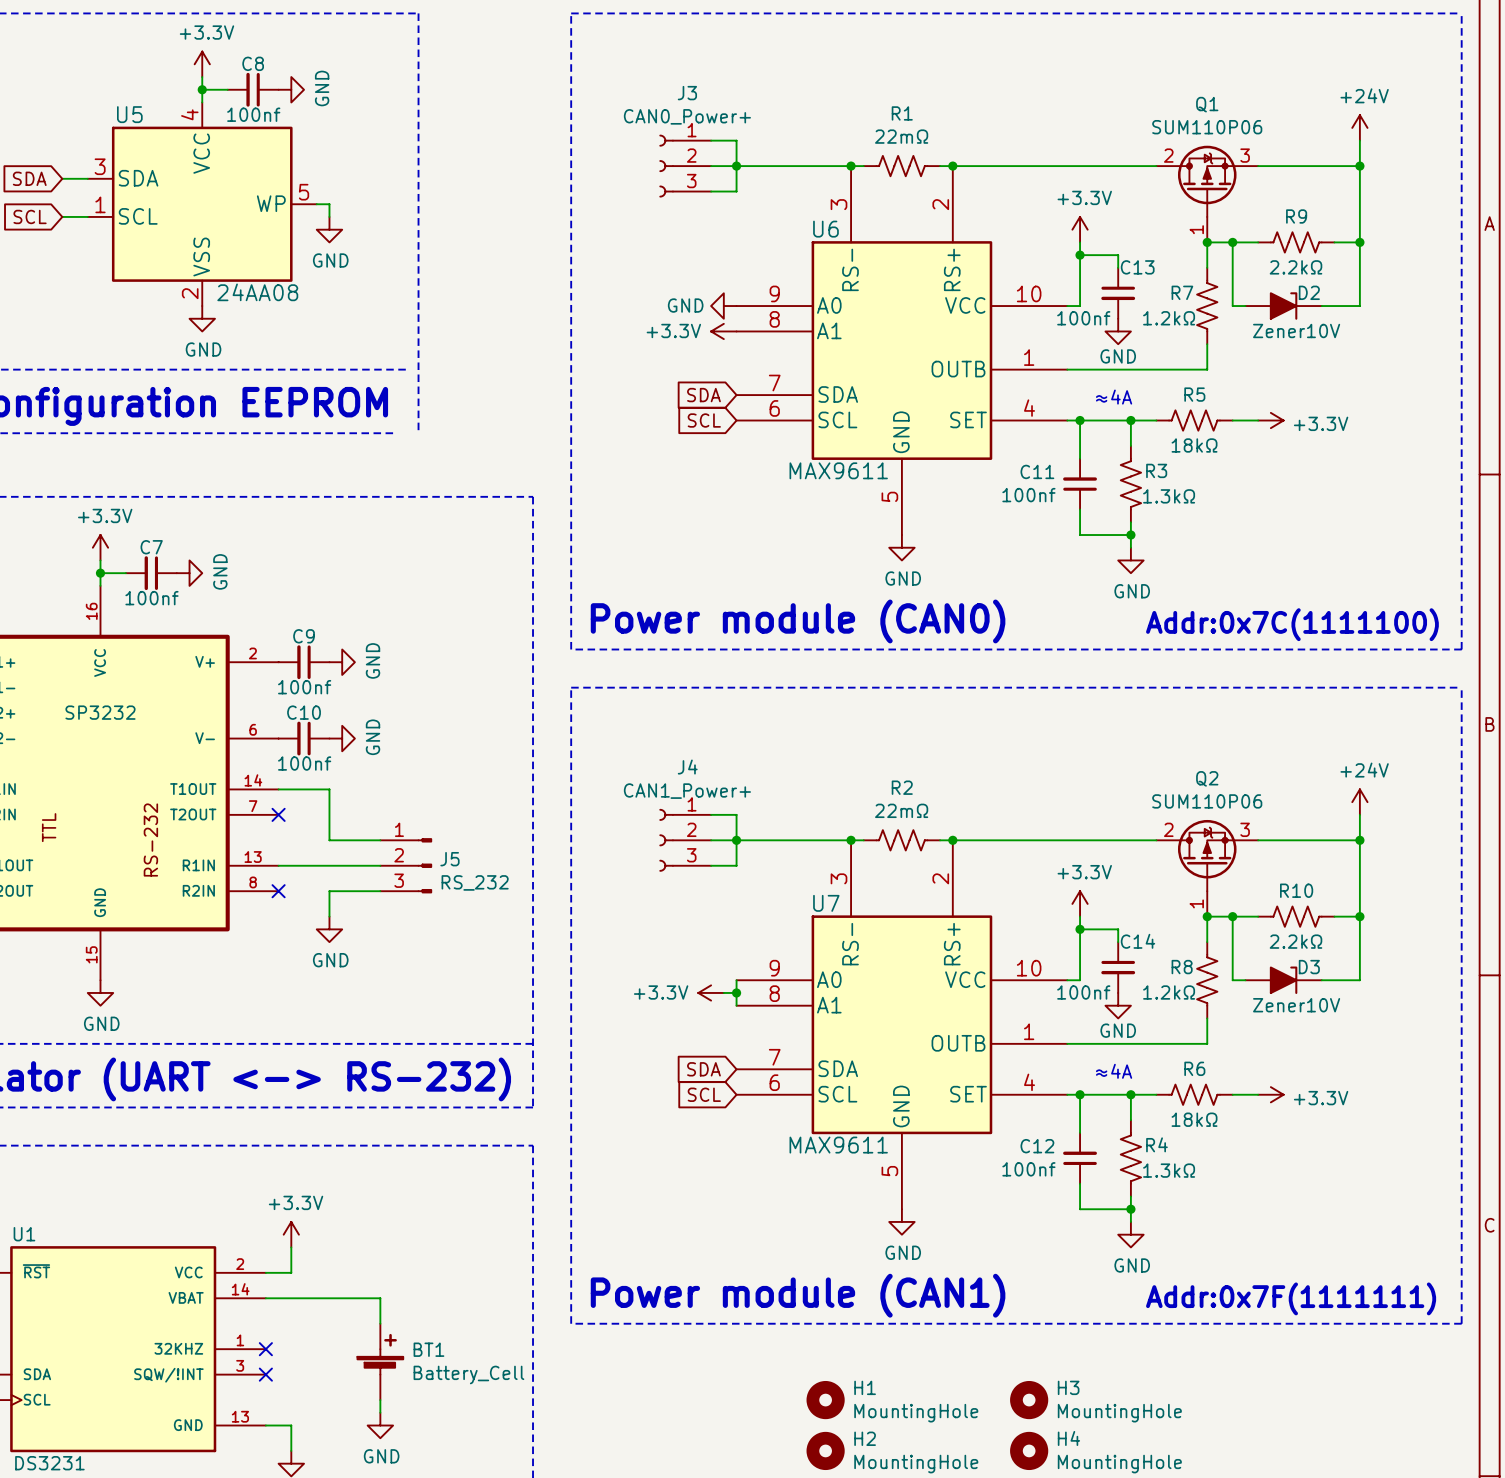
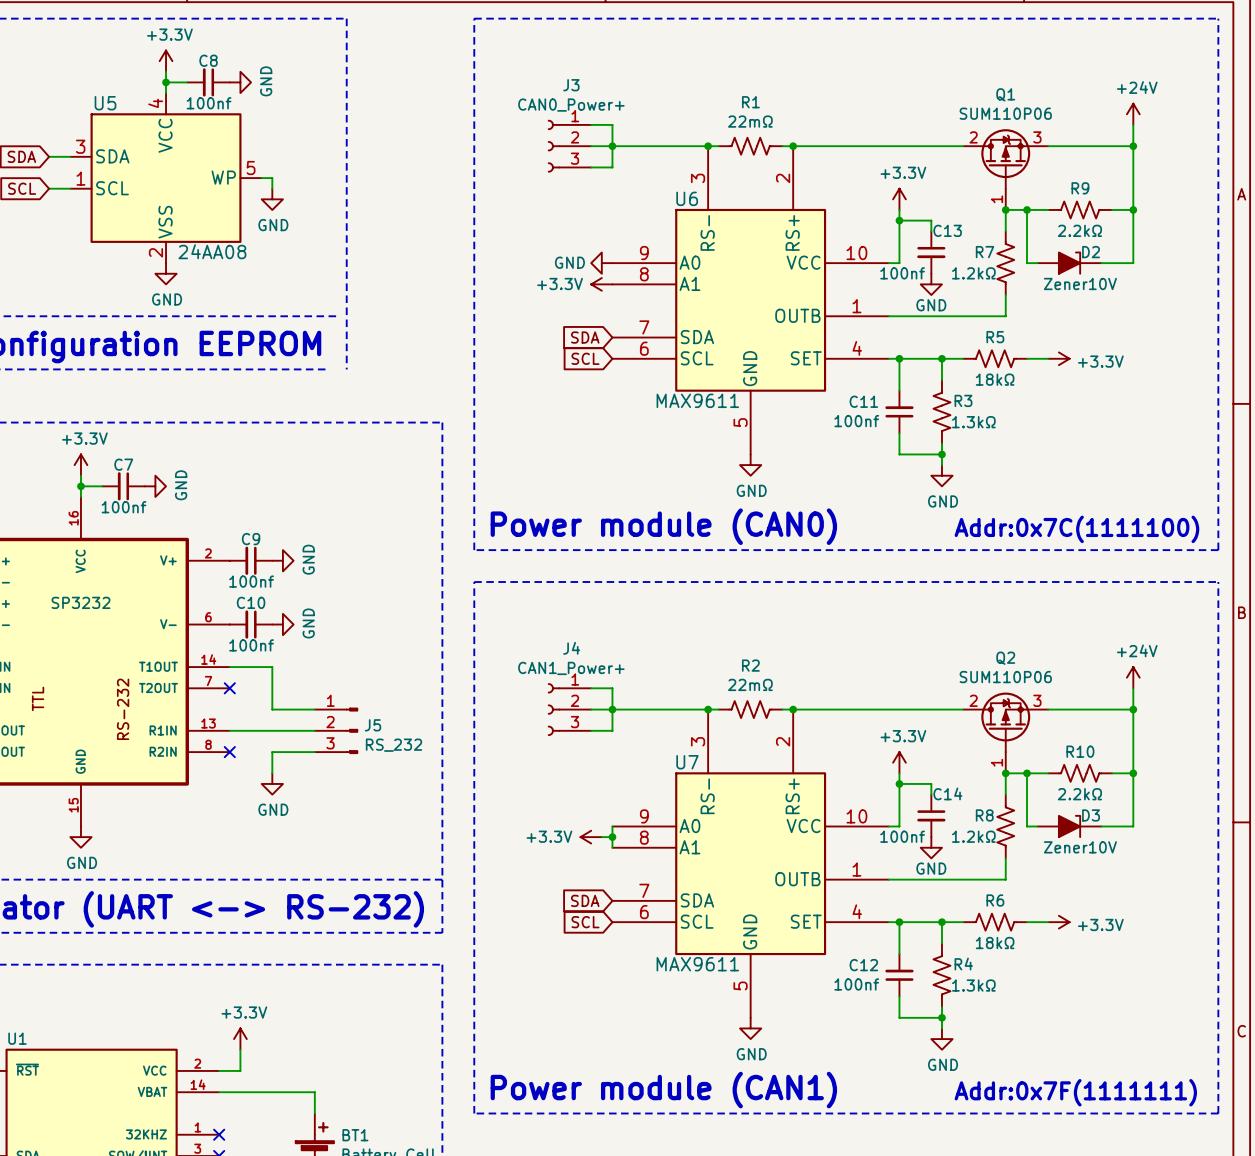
text: ≈4A (1114, 397) -> none
text: ≈4A (1114, 1071) -> none

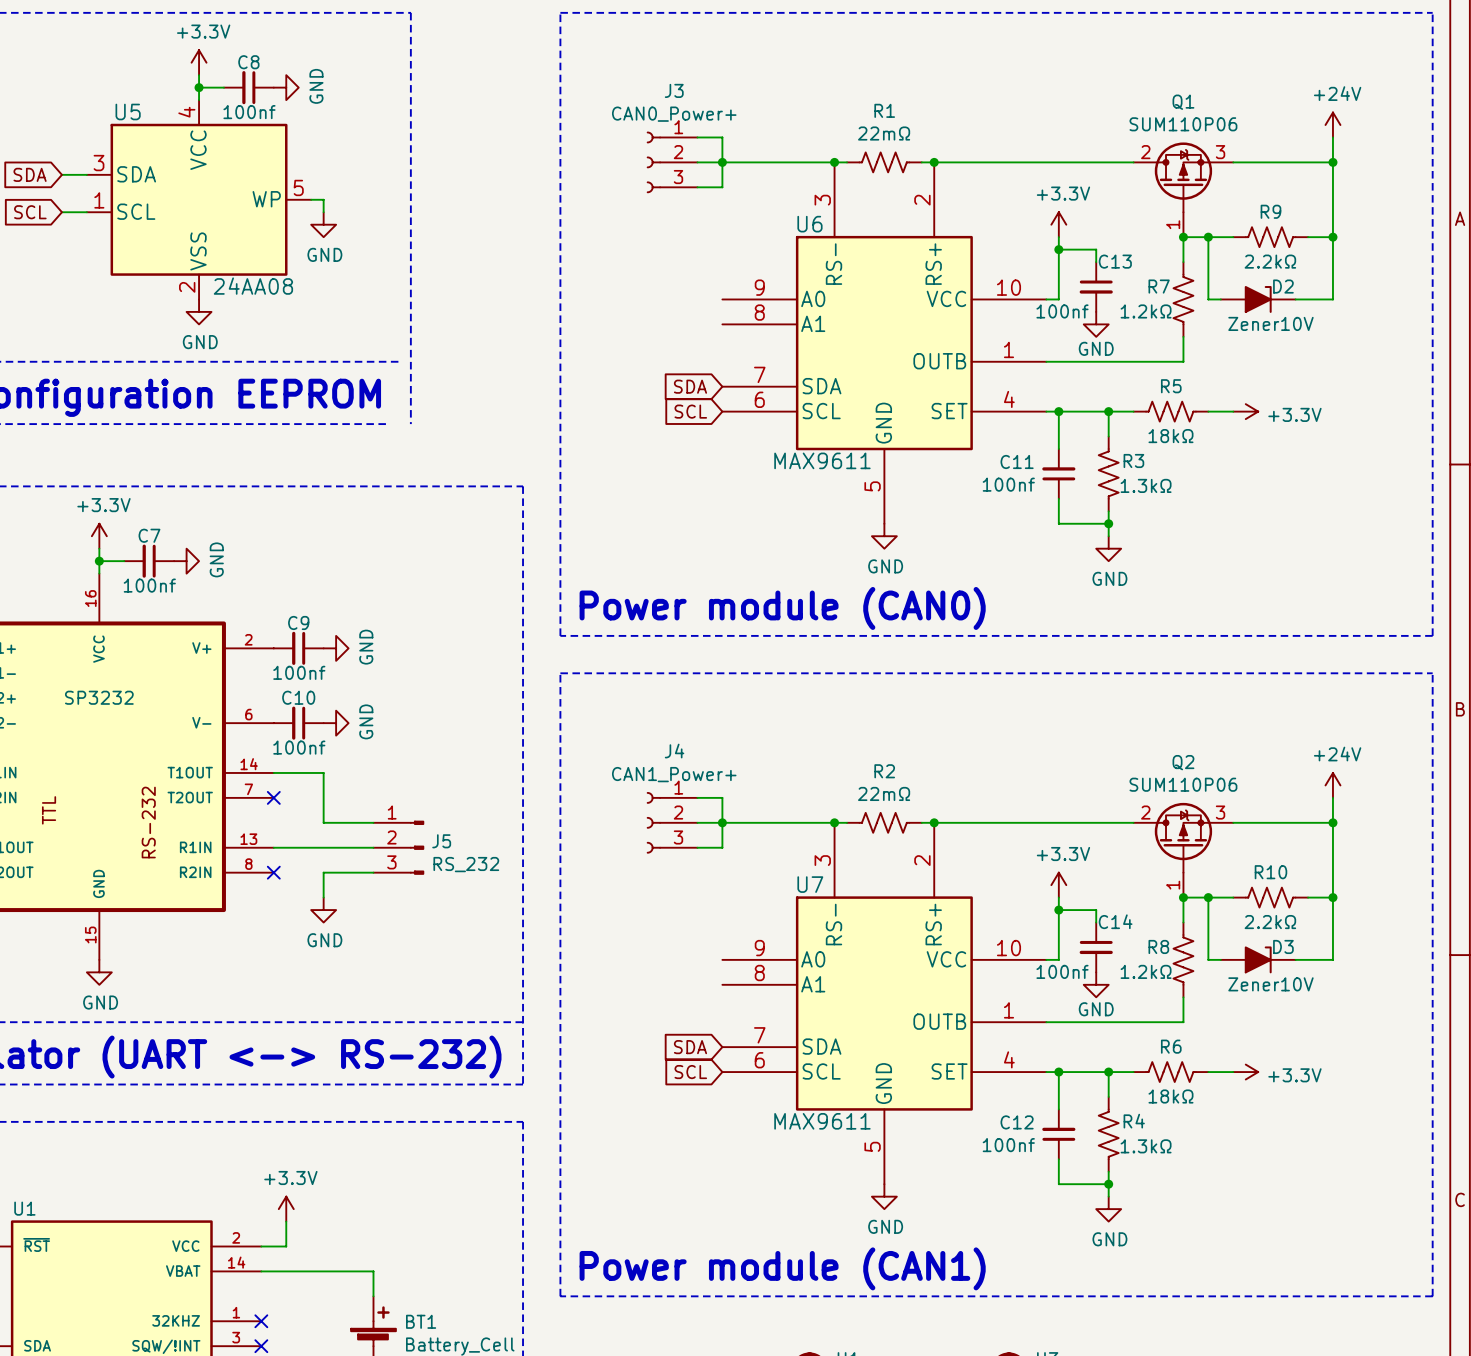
power symbol: GND (601, 263) -> none
power symbol: +3.3V (601, 284) -> none
text: Addr:0x7C(1111100) (1076, 529) -> none
wire: (612, 826) (612, 847) -> none
power symbol: +3.3V (591, 837) -> none
wire: (601, 837) (612, 837) -> none
junction: (612, 837) -> none
text: Addr:0x7F(1111111) (1075, 1092) -> none

